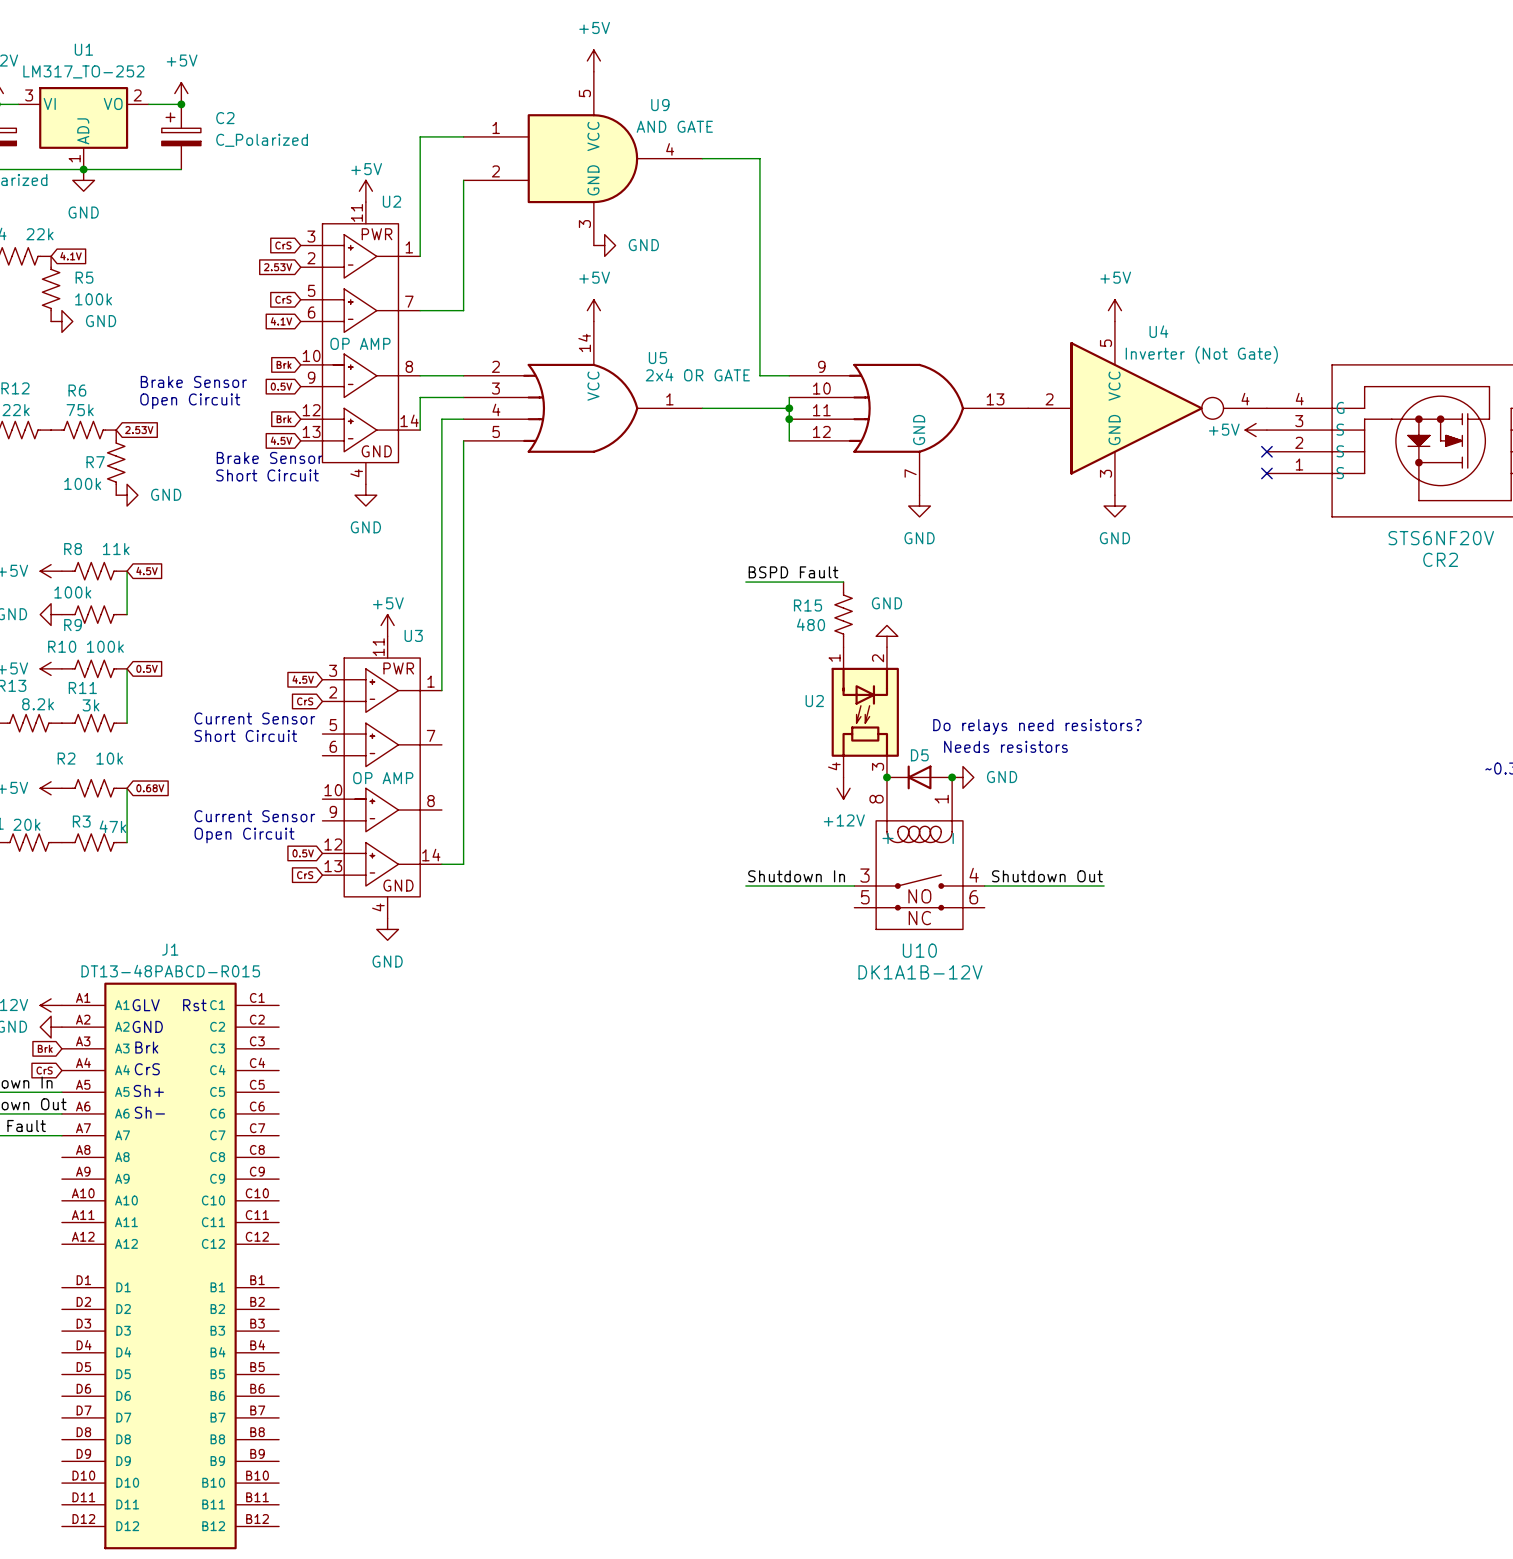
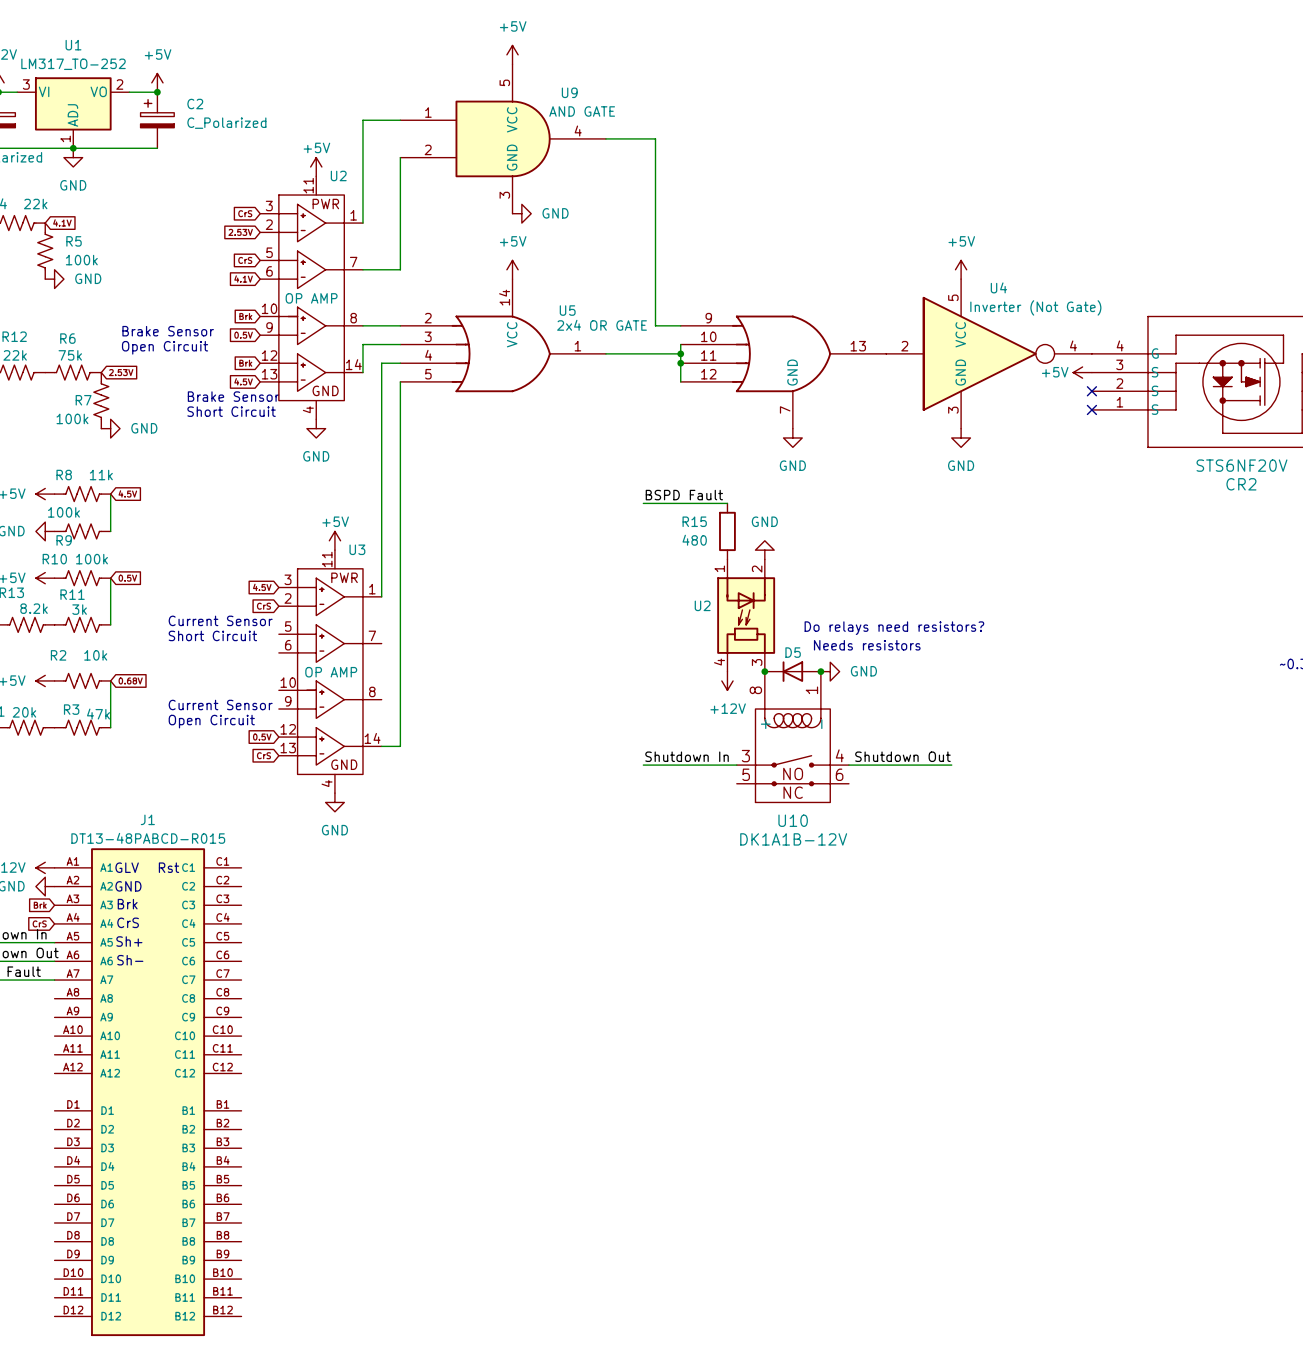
R15 symbol: [834, 582, 853, 648] -> [719, 503, 736, 560]

